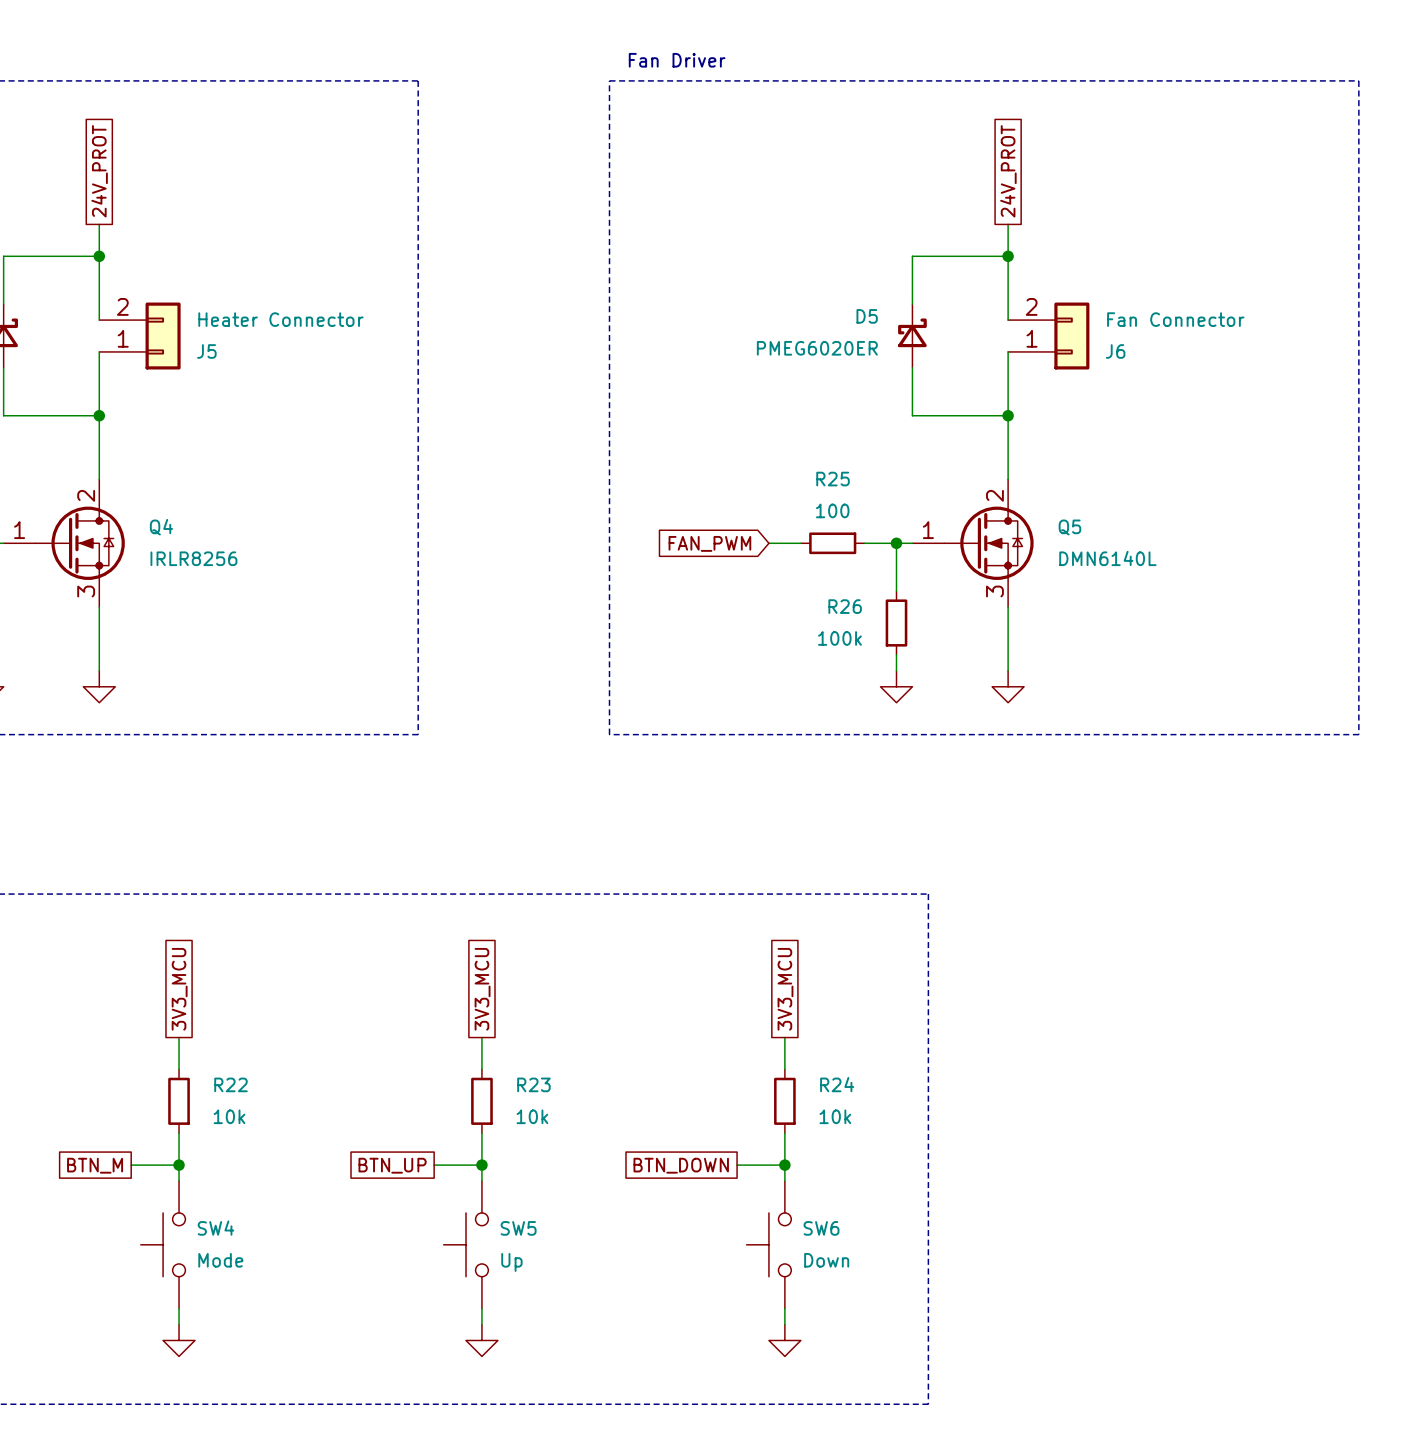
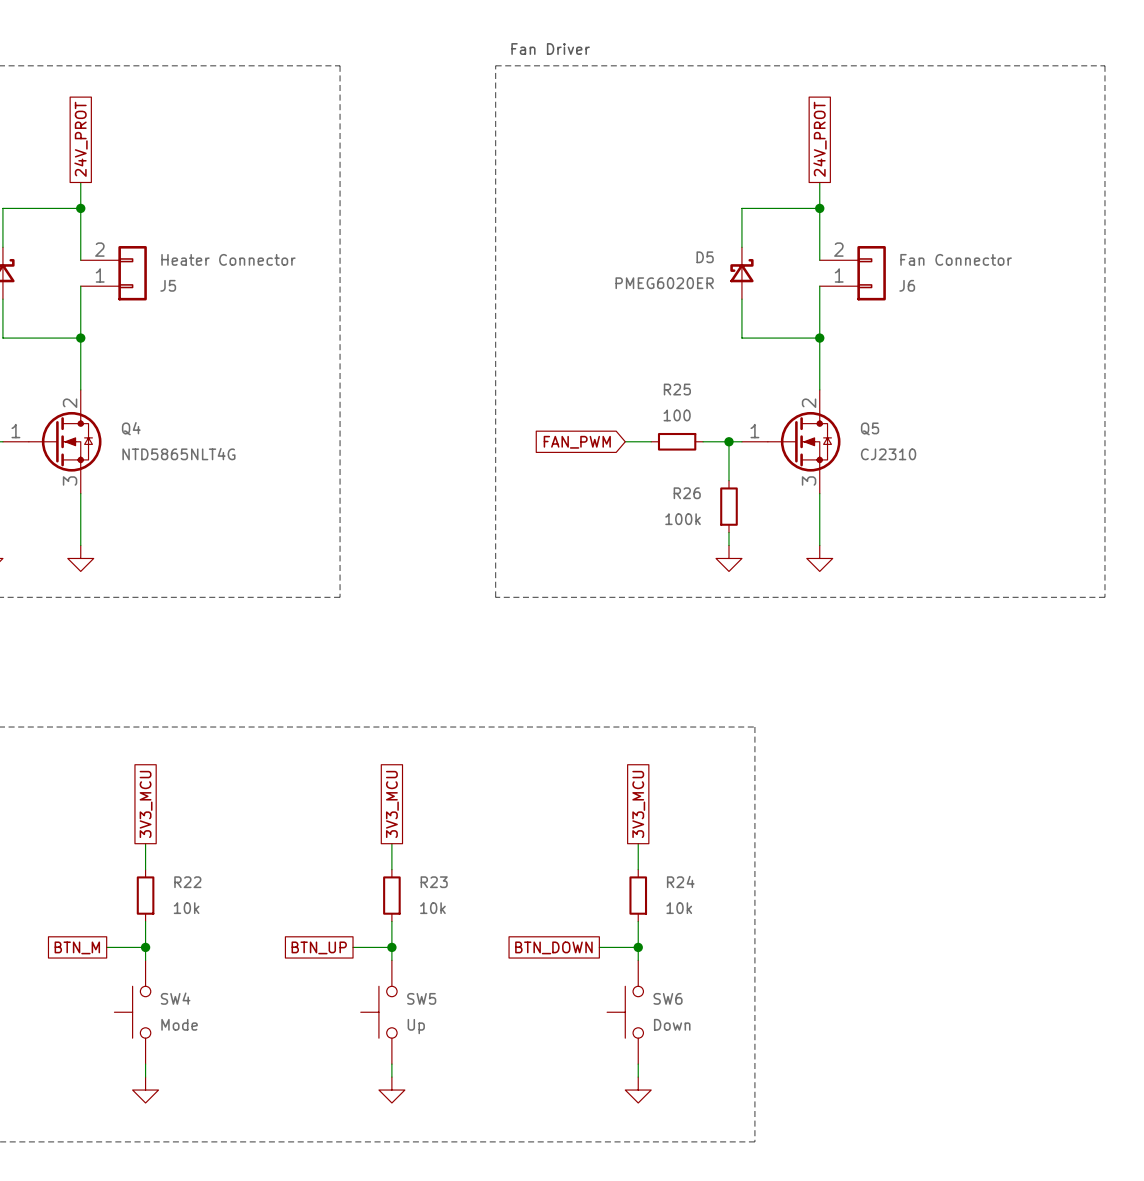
Q4 value: IRLR8256 (193, 558) -> NTD5865NLT4G (178, 454)
Q5 value: DMN6140L (1107, 558) -> CJ2310 (888, 454)

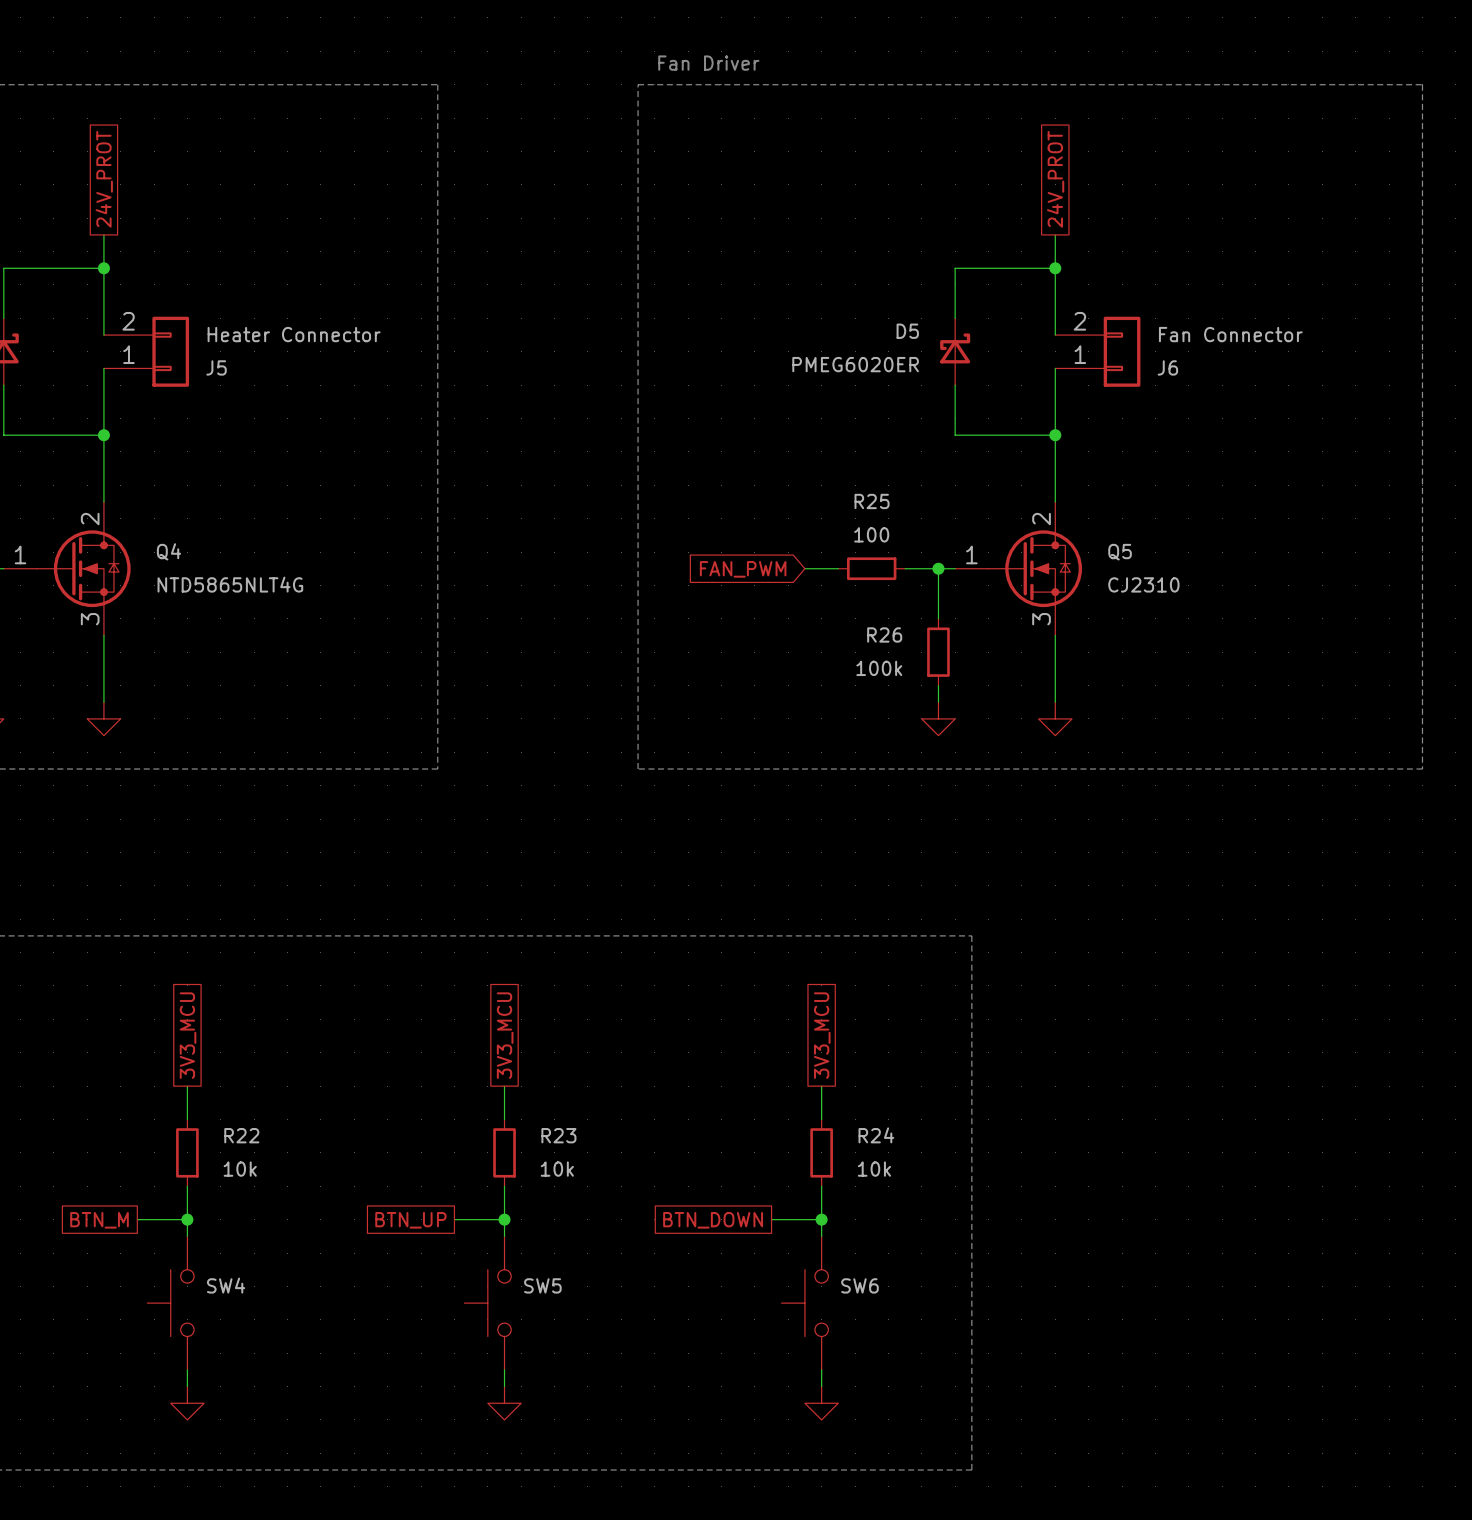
SW4 value: Mode (179, 1024) -> none
SW6 value: Down (672, 1024) -> none
SW5 value: Up (416, 1026) -> none

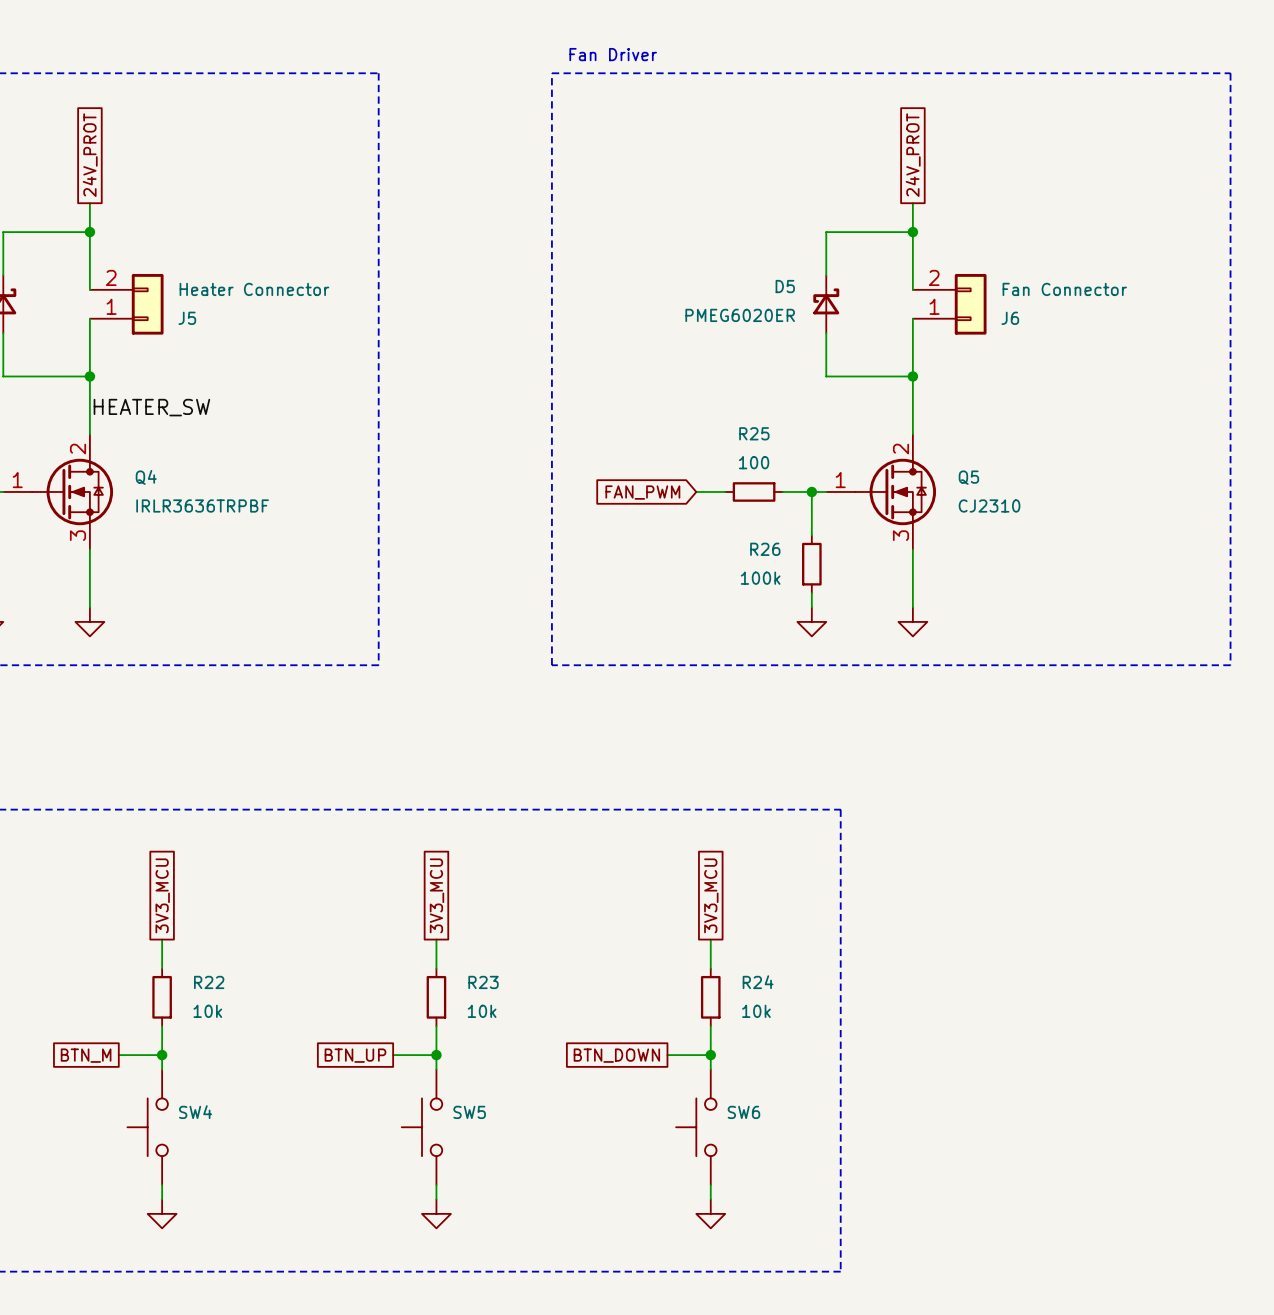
label: none -> HEATER_SW (151, 407)
Q4 value: NTD5865NLT4G (230, 584) -> IRLR3636TRPBF (202, 505)

